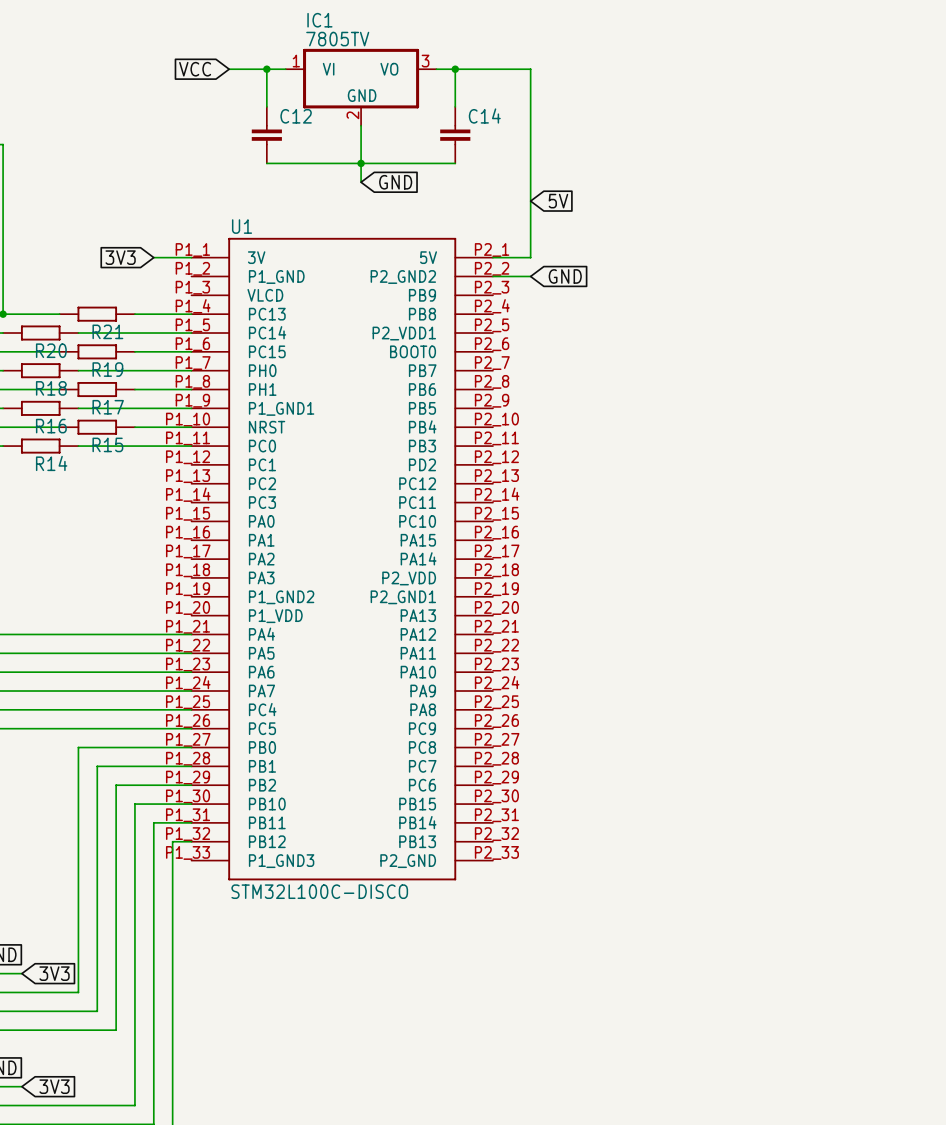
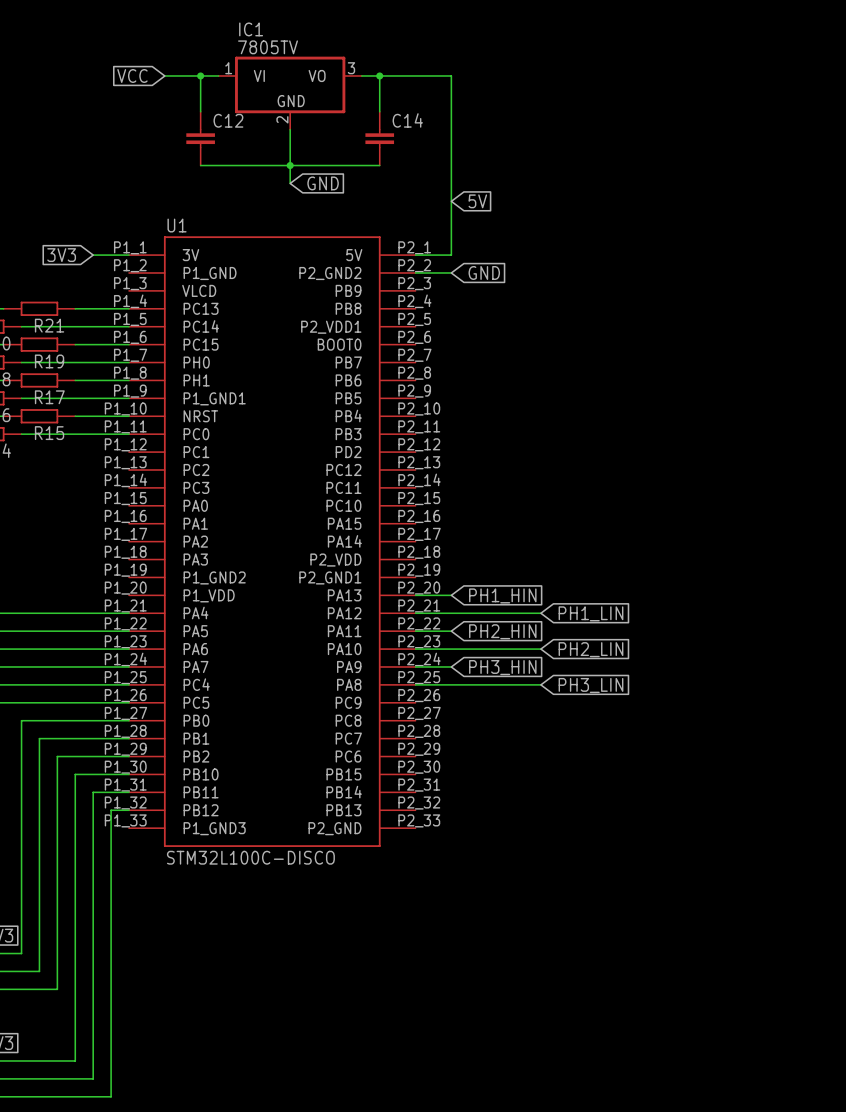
wire: none -> (415, 595) (451, 595)
global label: none -> PH1_HIN (502, 595)
wire: none -> (415, 613) (540, 613)
global label: none -> PH1_LIN (591, 613)
wire: none -> (415, 631) (451, 631)
global label: none -> PH2_HIN (502, 631)
wire: none -> (415, 649) (540, 649)
global label: none -> PH2_LIN (591, 649)
wire: none -> (415, 666) (451, 666)
global label: none -> PH3_HIN (502, 667)
wire: none -> (415, 684) (540, 684)
global label: none -> PH3_LIN (591, 685)

